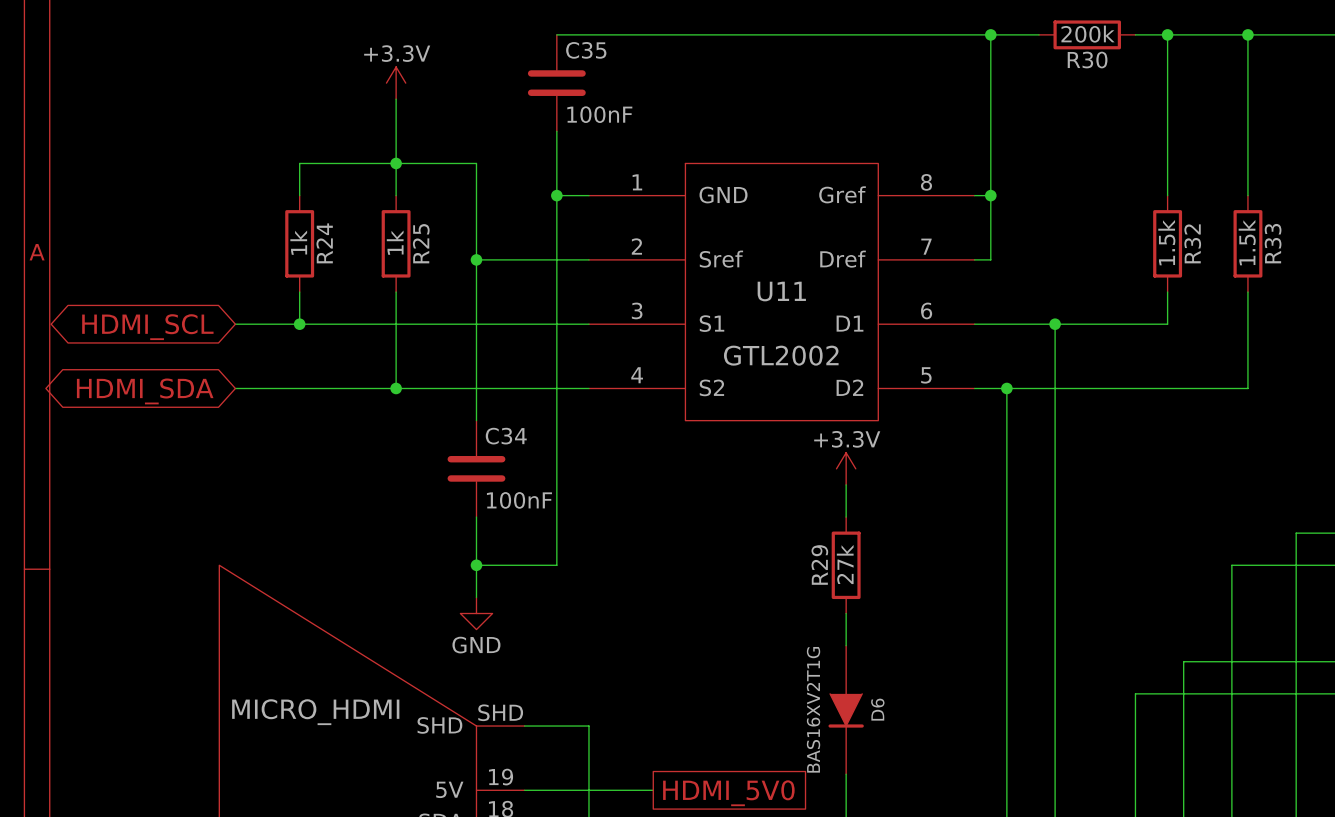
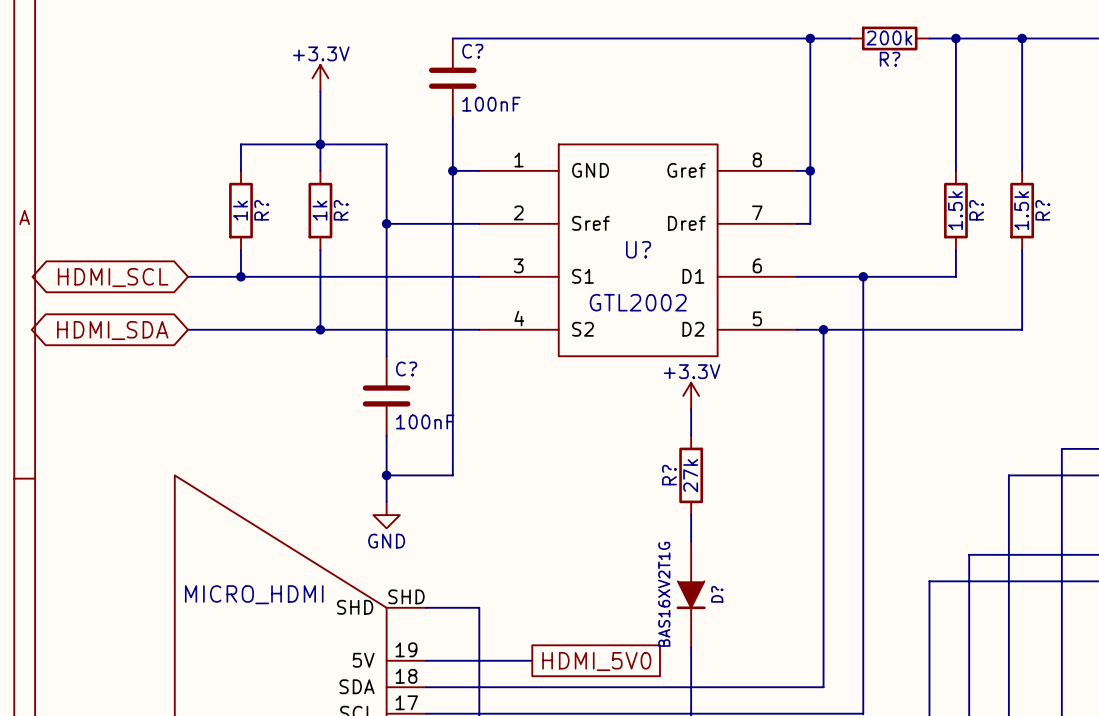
C35 name: C35 (586, 50) -> C? (472, 51)
R30 name: R30 (1087, 60) -> R? (890, 59)
R24 name: R24 (324, 243) -> R? (261, 210)
R25 name: R25 (421, 243) -> R? (341, 210)
R32 name: R32 (1192, 243) -> R? (976, 210)
R33 name: R33 (1273, 243) -> R? (1042, 210)
U11 name: U11 (781, 291) -> U? (638, 249)
C34 name: C34 (506, 436) -> C? (406, 368)
R29 name: R29 (819, 564) -> R? (669, 475)
D6 name: D6 (877, 709) -> D? (717, 594)

